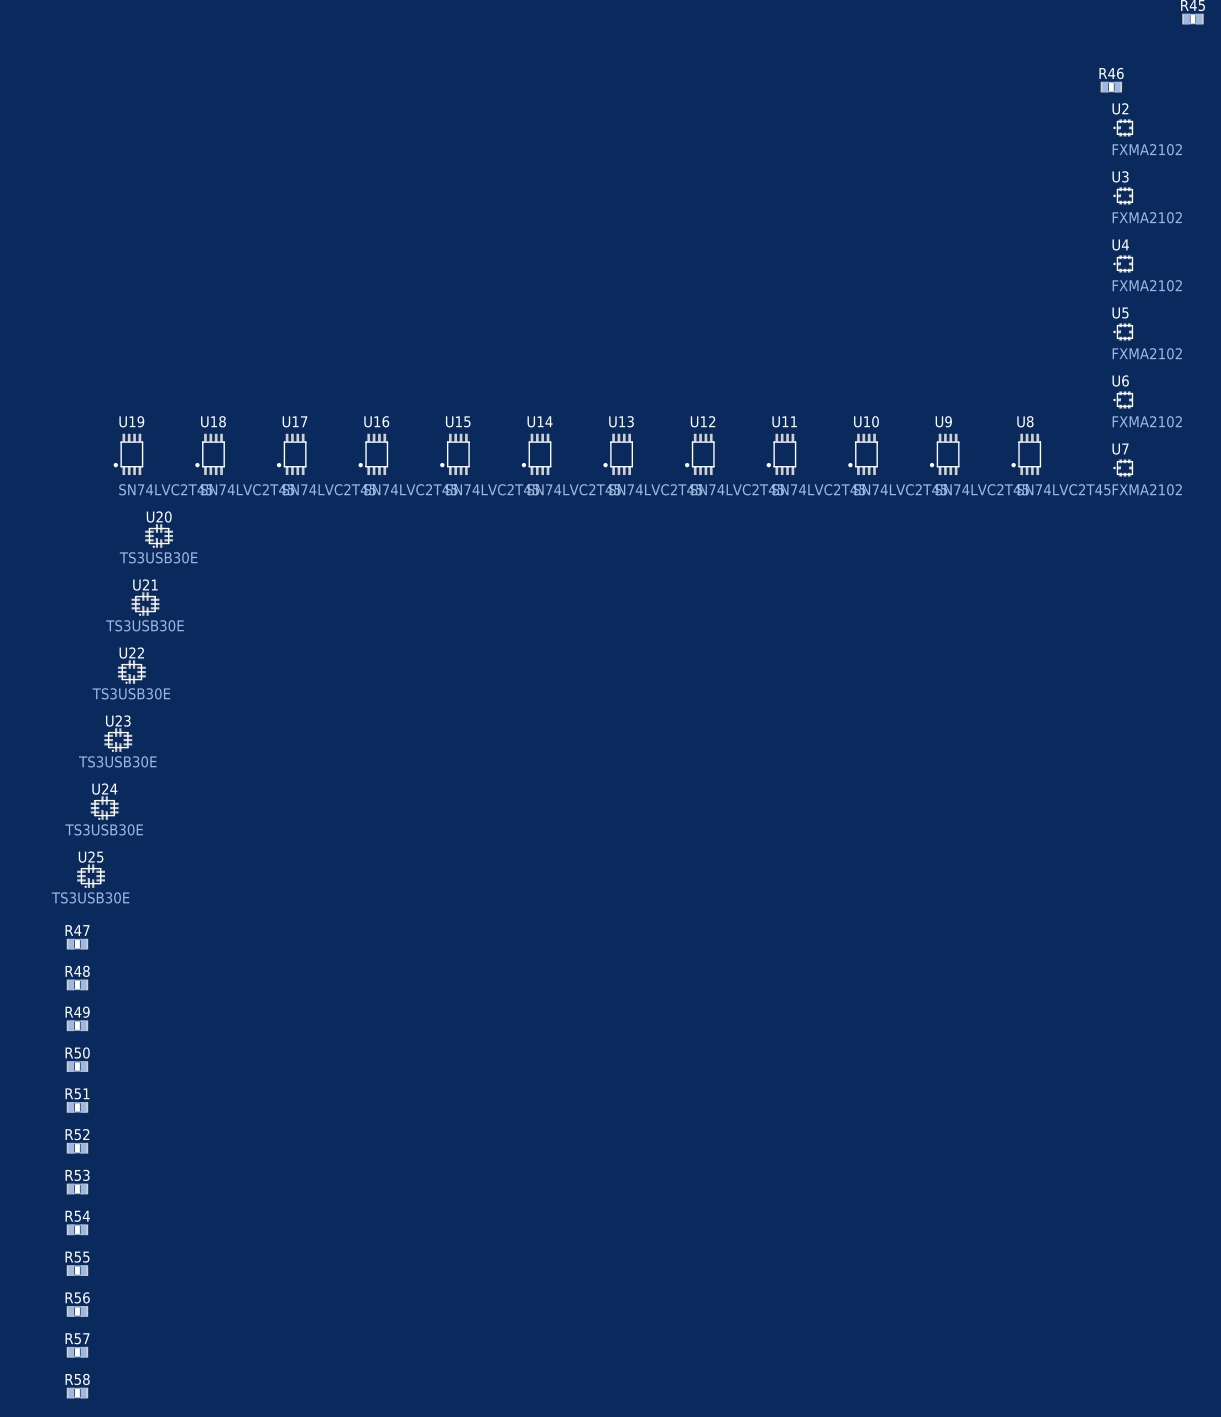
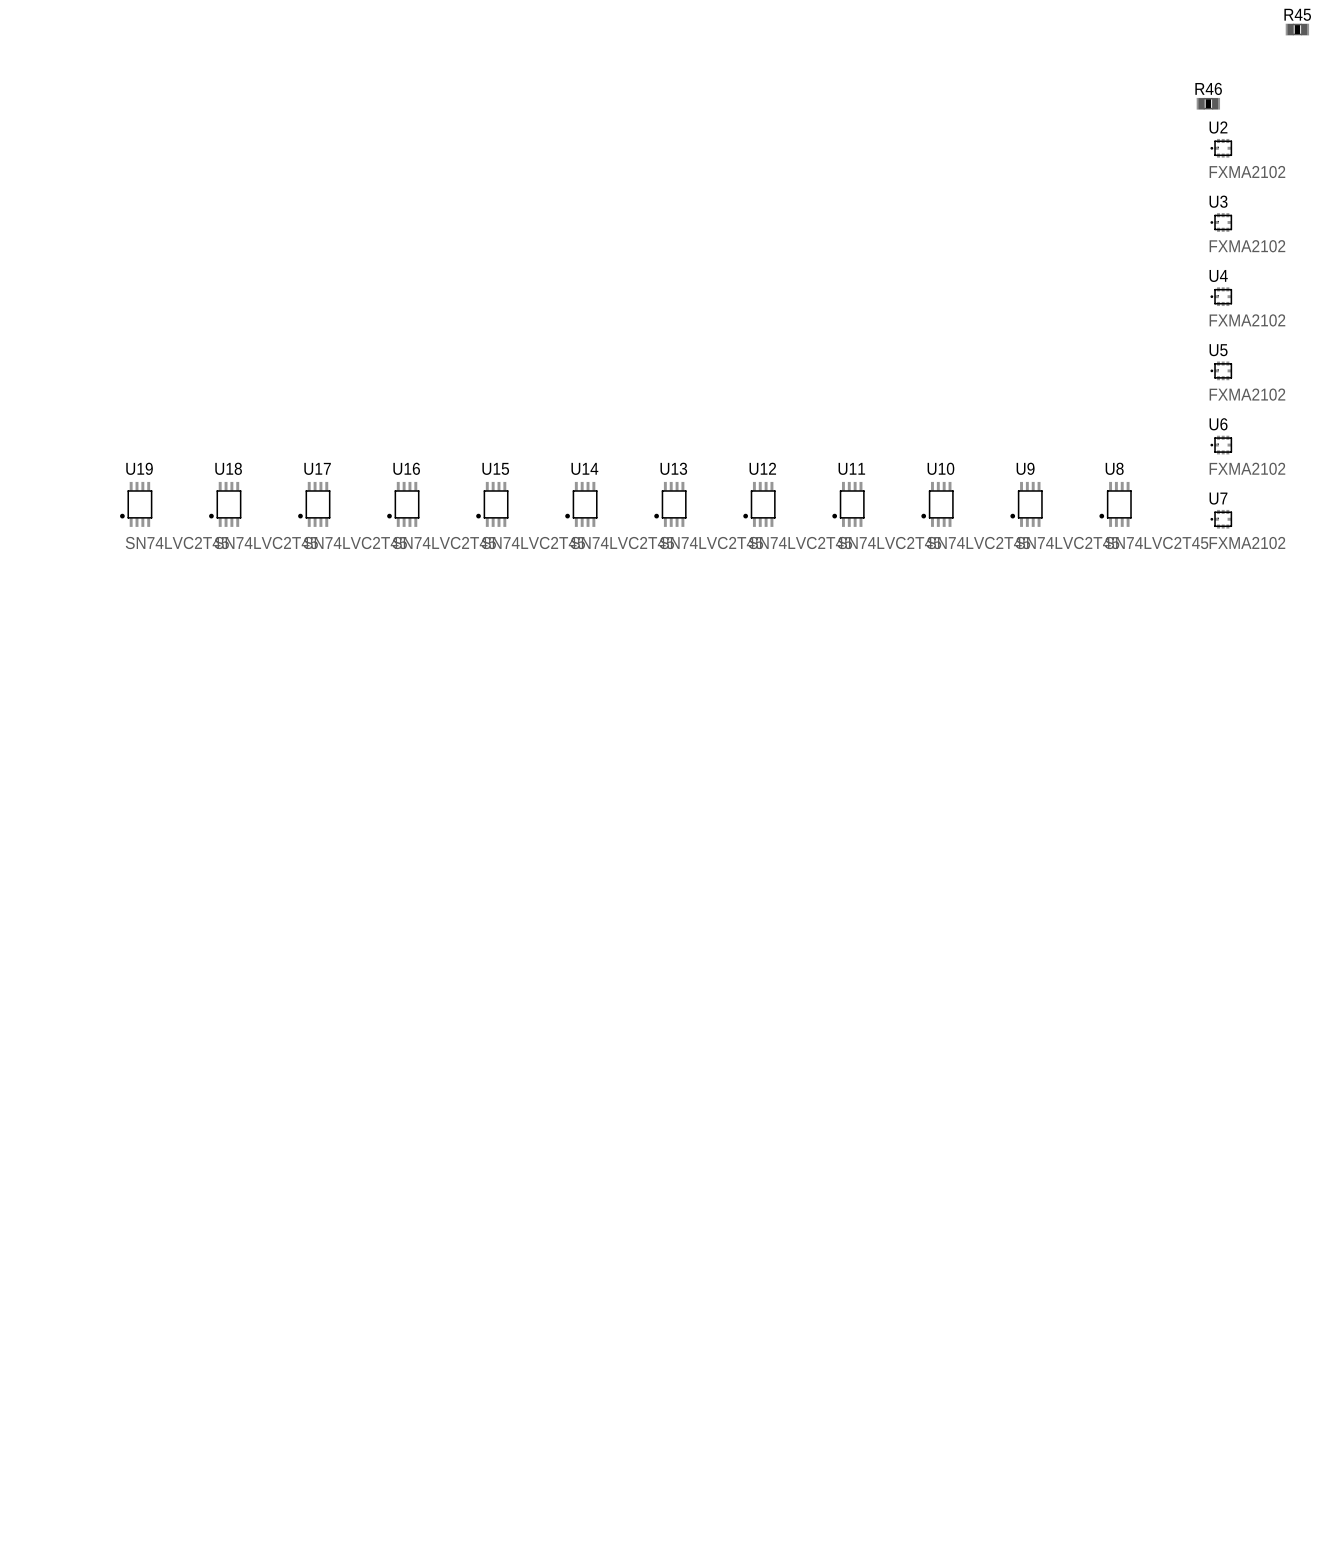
U20: TS3USB30E (159, 536) -> none
U21: TS3USB30E (145, 604) -> none
U22: TS3USB30E (131, 672) -> none
U23: TS3USB30E (118, 740) -> none
U24: TS3USB30E (104, 808) -> none
U25: TS3USB30E (91, 876) -> none
R47: (77, 944) -> none
R48: (77, 984) -> none
R49: (77, 1025) -> none
R50: (77, 1066) -> none
R51: (77, 1107) -> none
R52: (77, 1148) -> none
R53: (77, 1189) -> none
R54: (77, 1229) -> none
R55: (77, 1270) -> none
R56: (77, 1311) -> none
R57: (77, 1352) -> none
R58: (77, 1393) -> none

